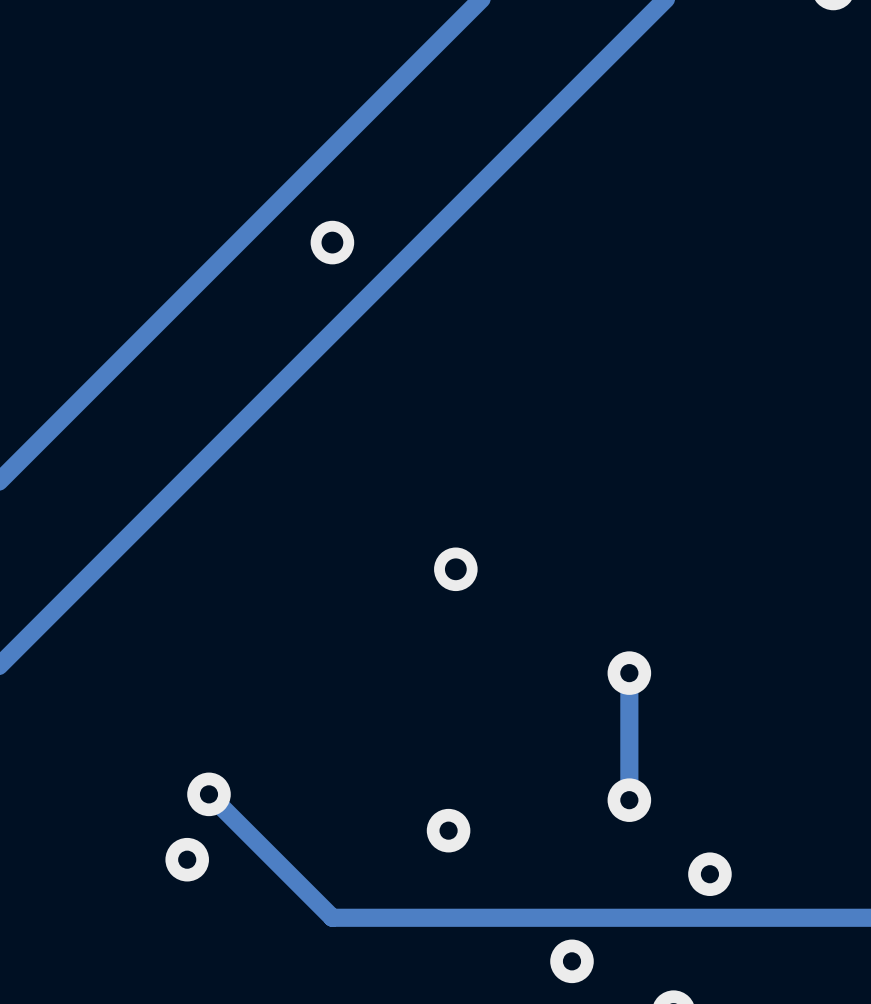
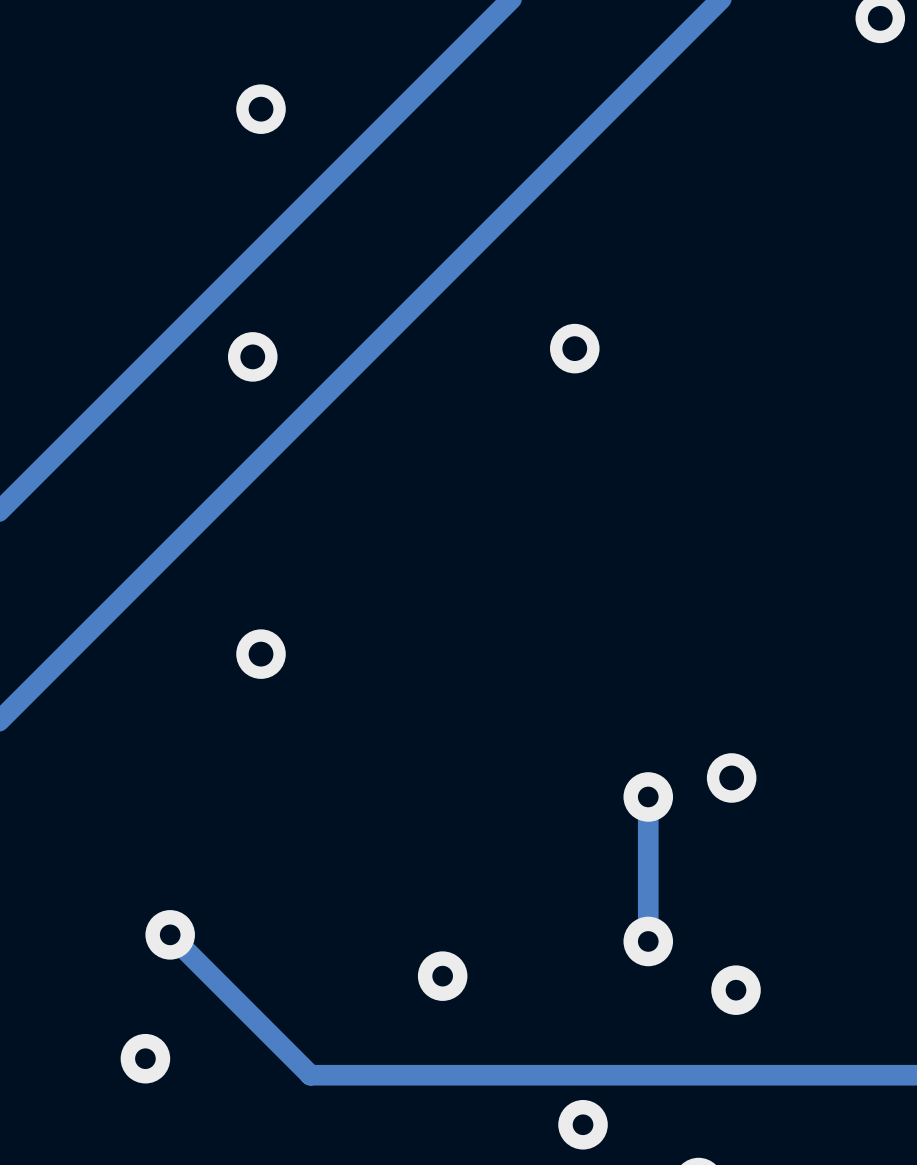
via: none -> (261, 109)
via position: (332, 242) -> (252, 356)
via: none -> (574, 348)
via: none -> (261, 654)
via: (455, 569) -> none
via: none -> (731, 777)
via position: (187, 859) -> (145, 1058)
via position: (709, 874) -> (736, 990)

